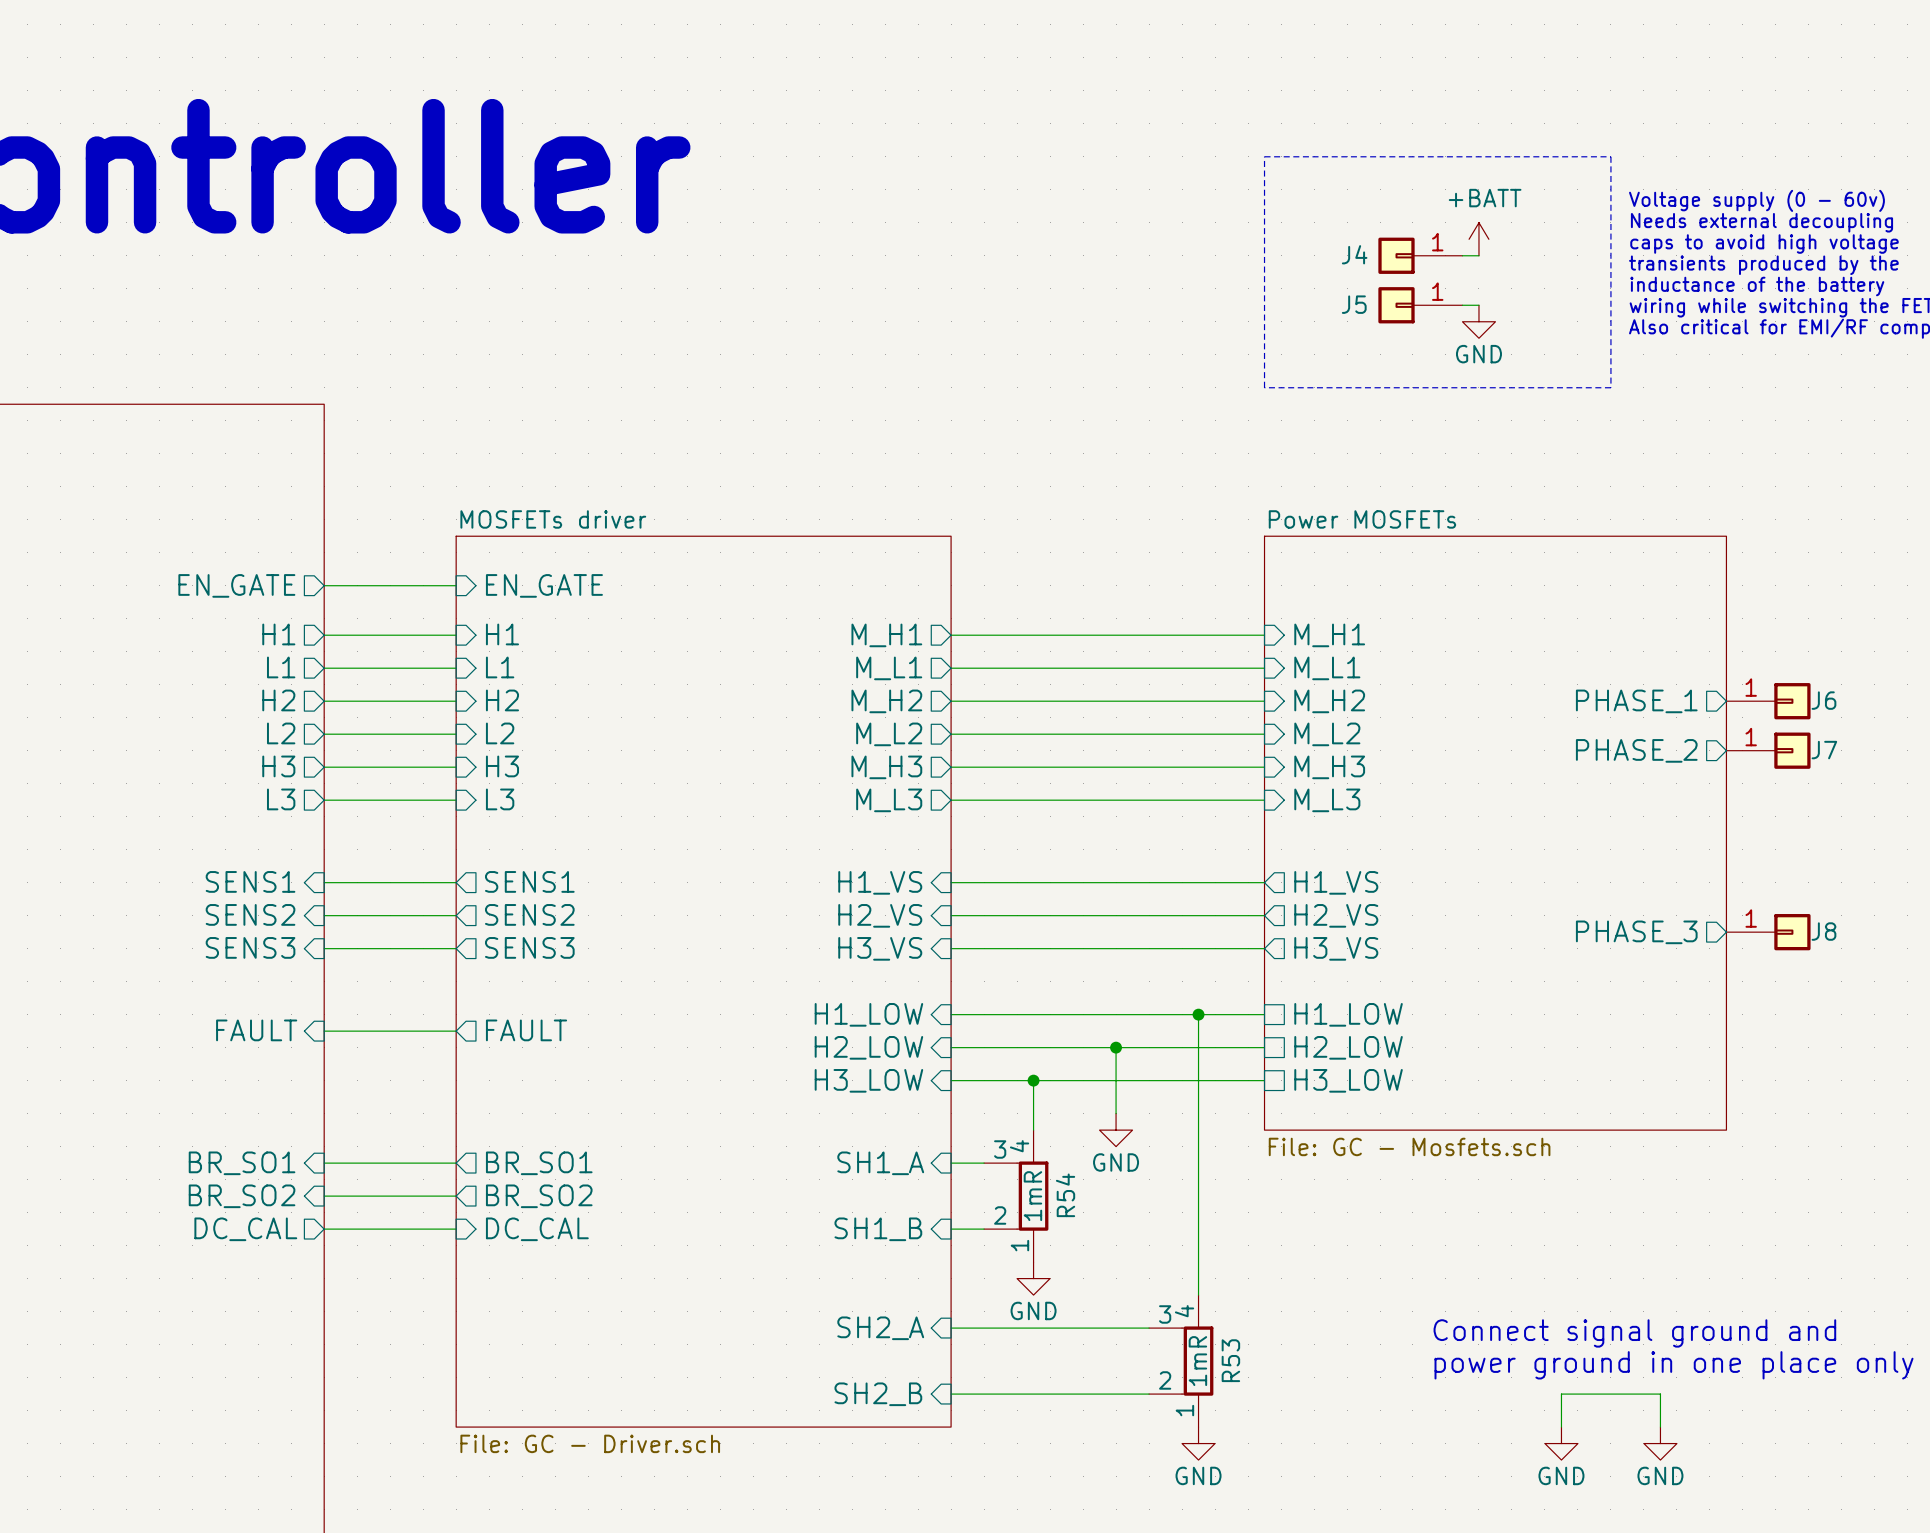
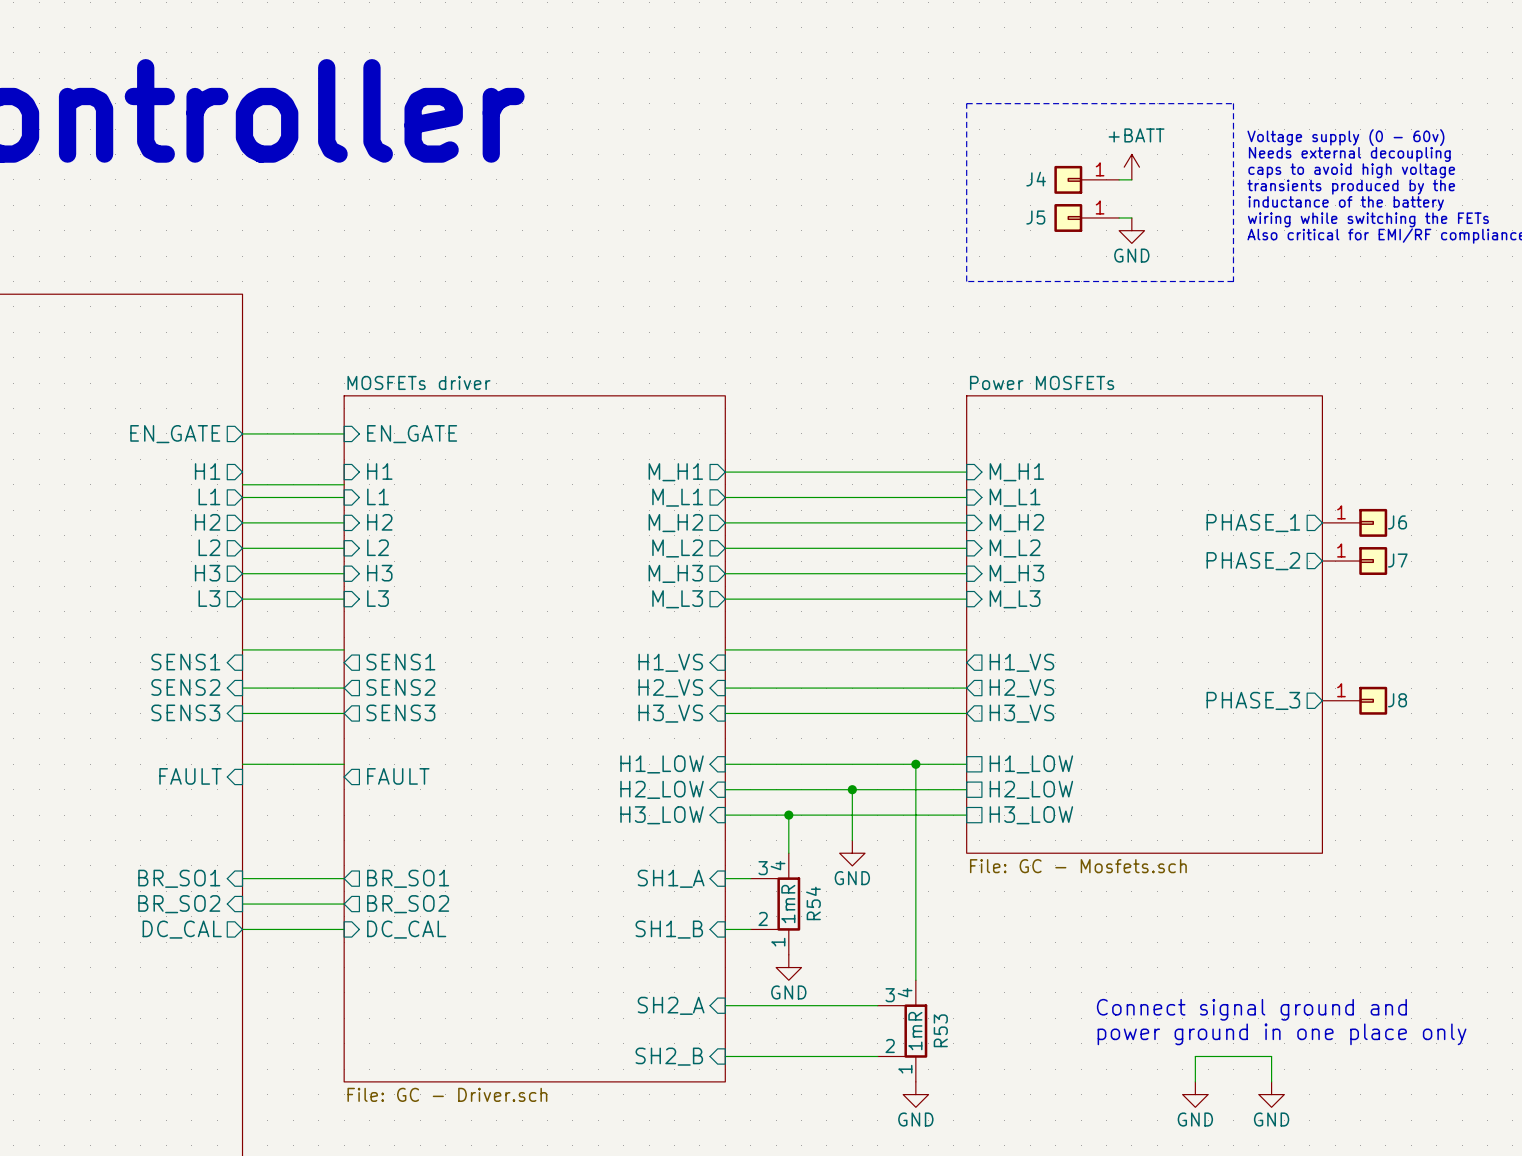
wire: (324, 635) (456, 635) -> (242, 484) (344, 484)
wire: (324, 882) (456, 882) -> (242, 649) (344, 649)
wire: (951, 882) (1264, 882) -> (725, 649) (966, 649)
wire: (324, 1031) (456, 1031) -> (242, 764) (344, 764)

